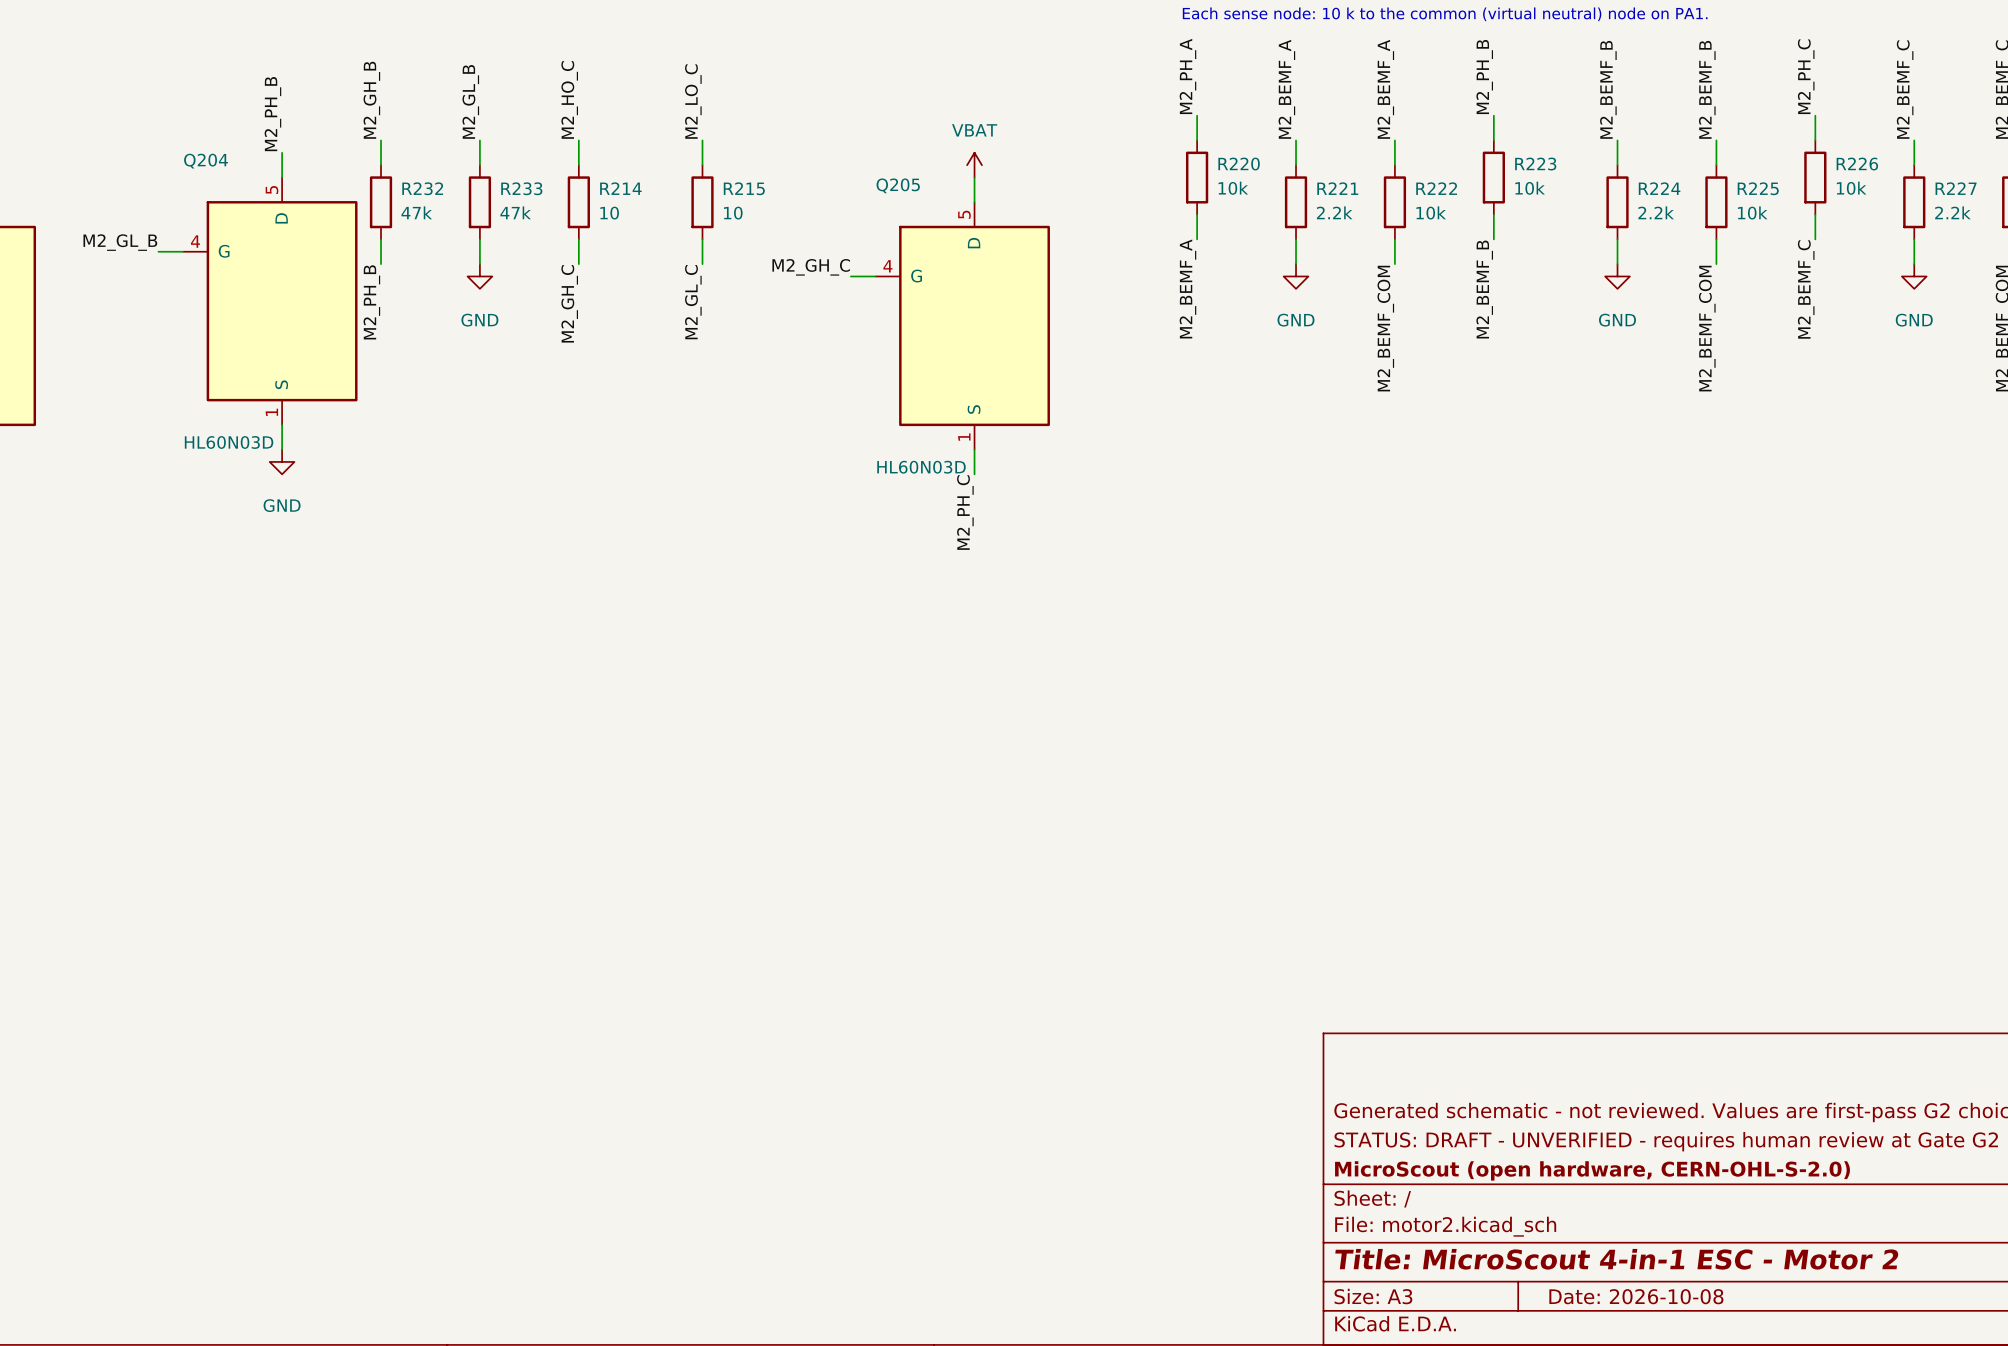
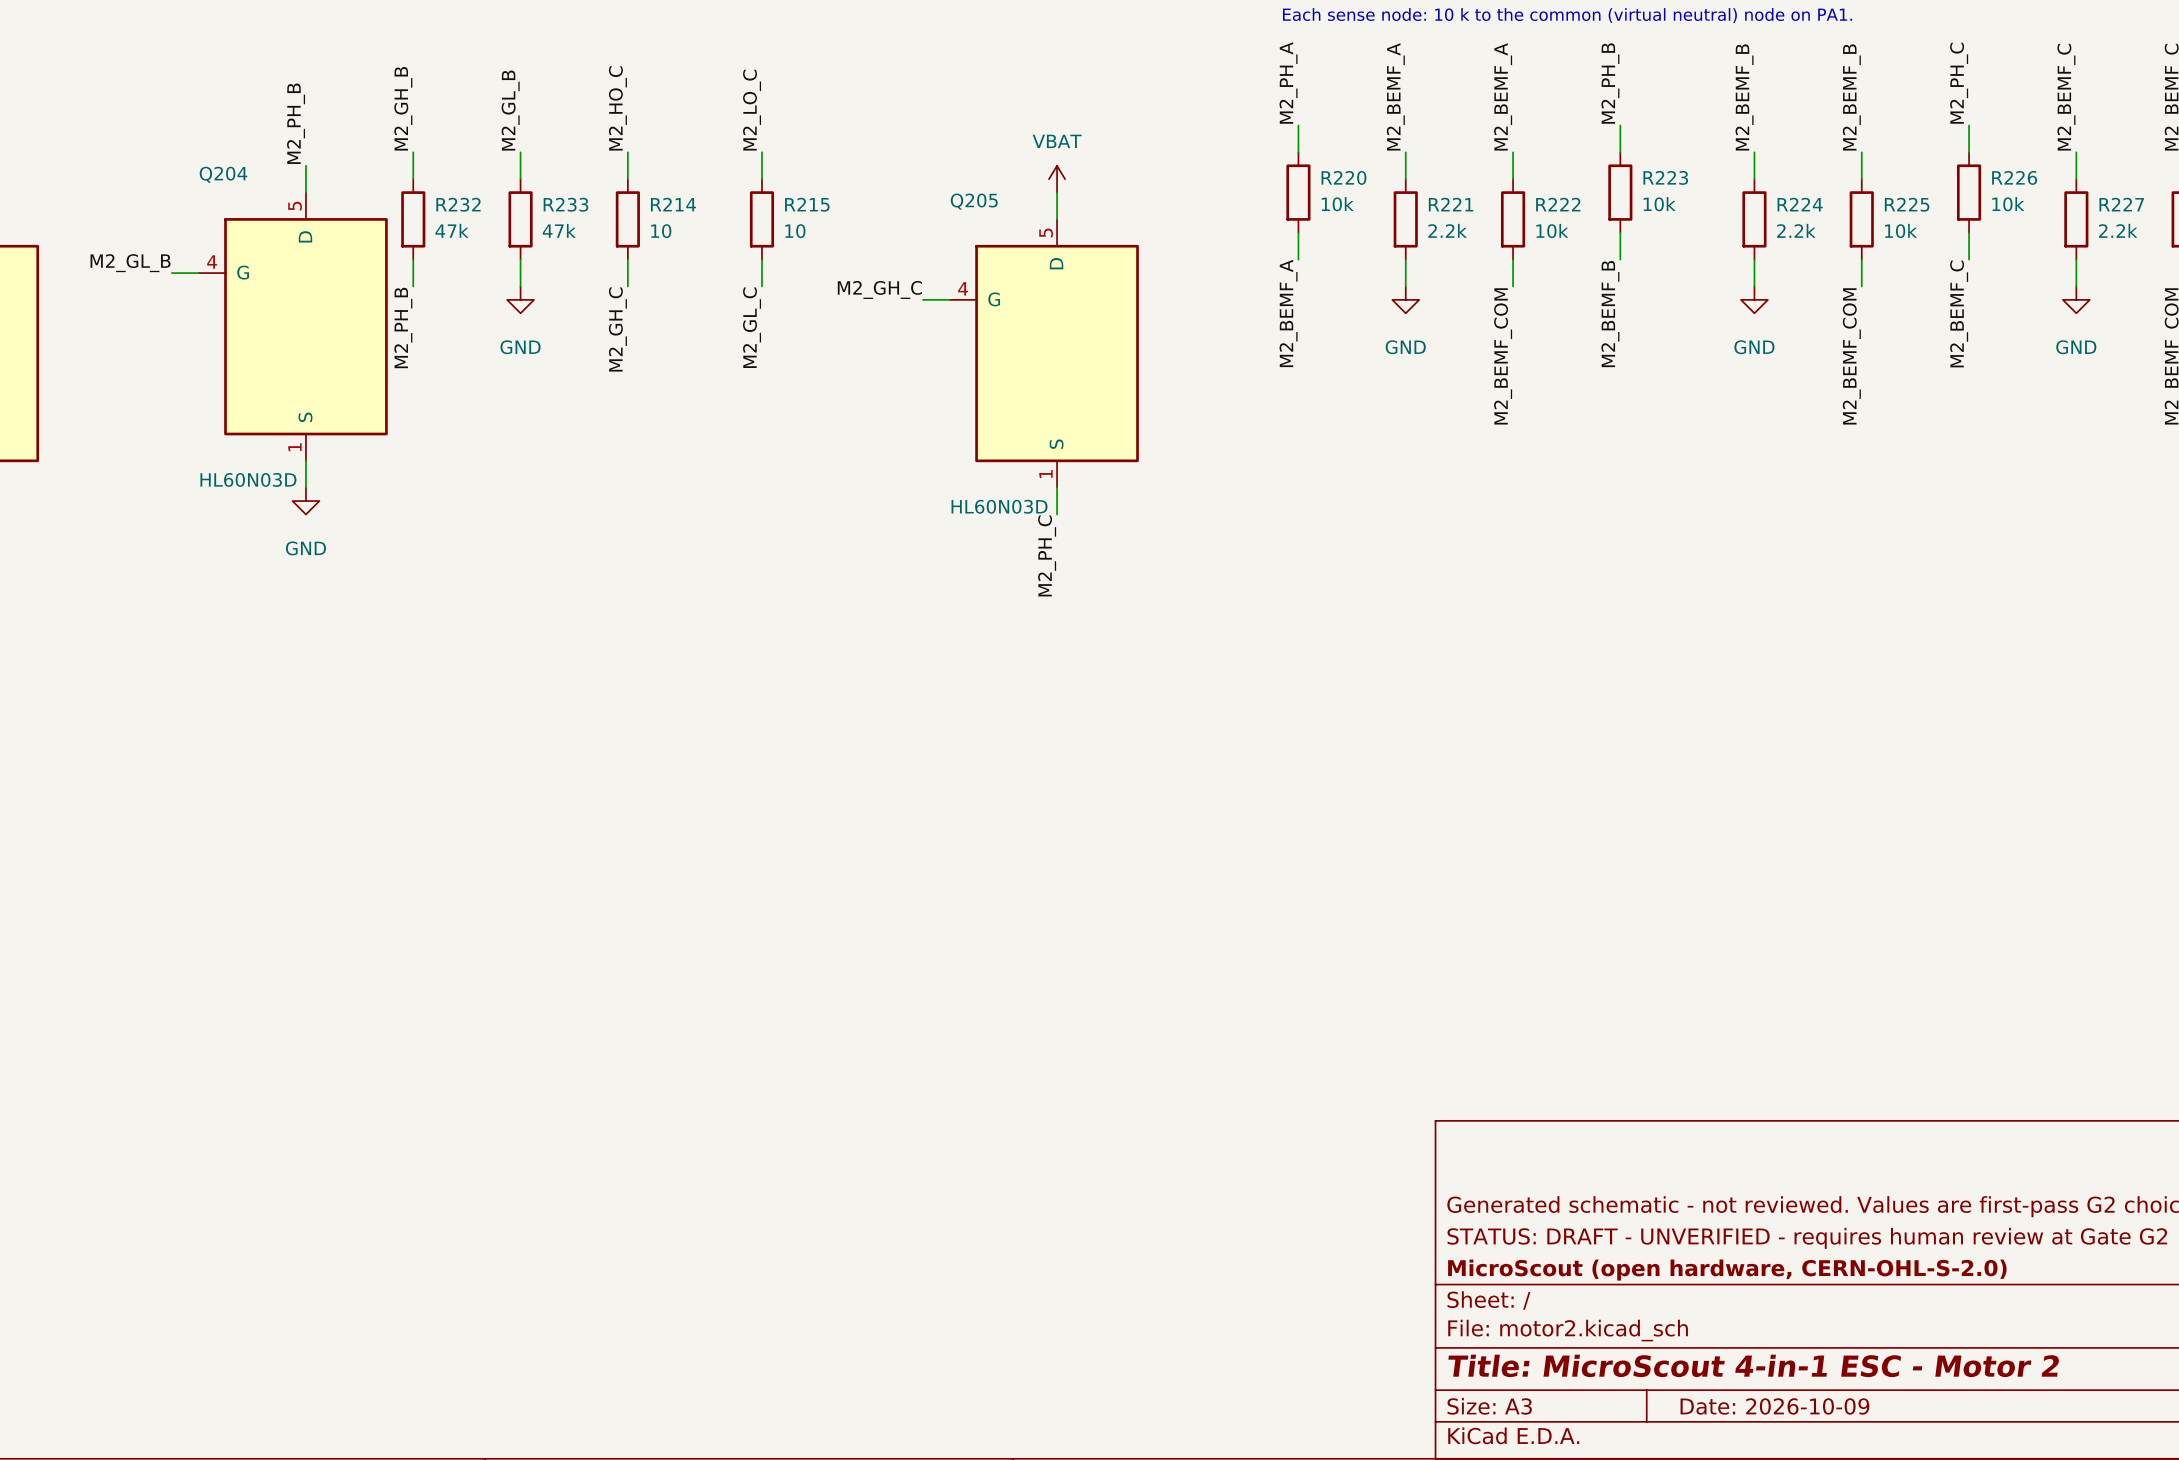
title block: Date: 2026-10-08 (1636, 1296) -> Date: 2026-10-09 (1774, 1406)

